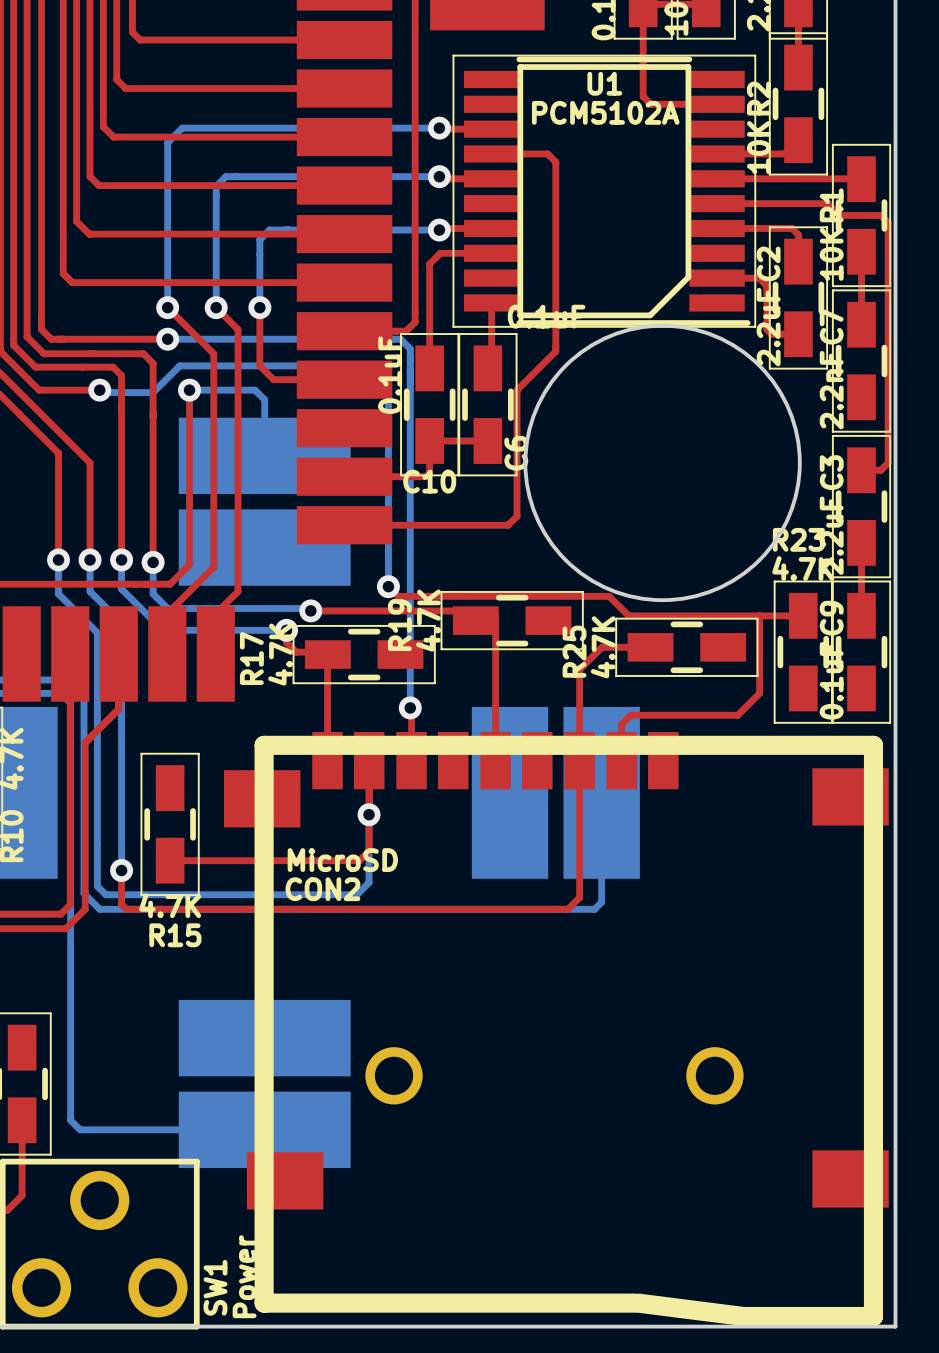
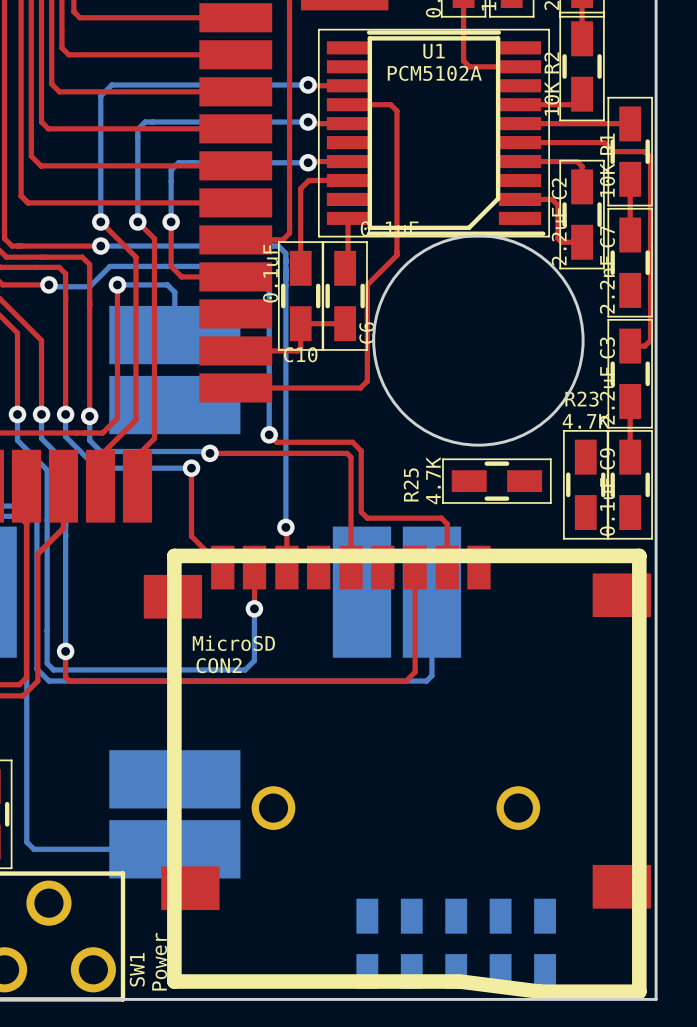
top track: (497, 596) (609, 596) (628, 615) (803, 615) -> (352, 442) (361, 450) (361, 512) (367, 518) (441, 518) (447, 523) (447, 540)
top track: (759, 615) (759, 693) (737, 715) (631, 715) (621, 724) -> none
R19 side: top (512, 620) -> bottom (545, 943)
top track: (286, 642) (296, 652) (324, 652) (327, 654) (327, 760) -> (191, 477) (191, 536) (222, 567)
top track: (650, 647) (601, 647) (579, 669) (579, 760) -> none
R17 side: top (364, 654) -> bottom (411, 943)
top track: (369, 814) (369, 850) (359, 860) (170, 860) -> none
R15 side: top (170, 824) -> bottom (456, 943)
part: none -> (367, 943)
part: none -> (500, 943)

